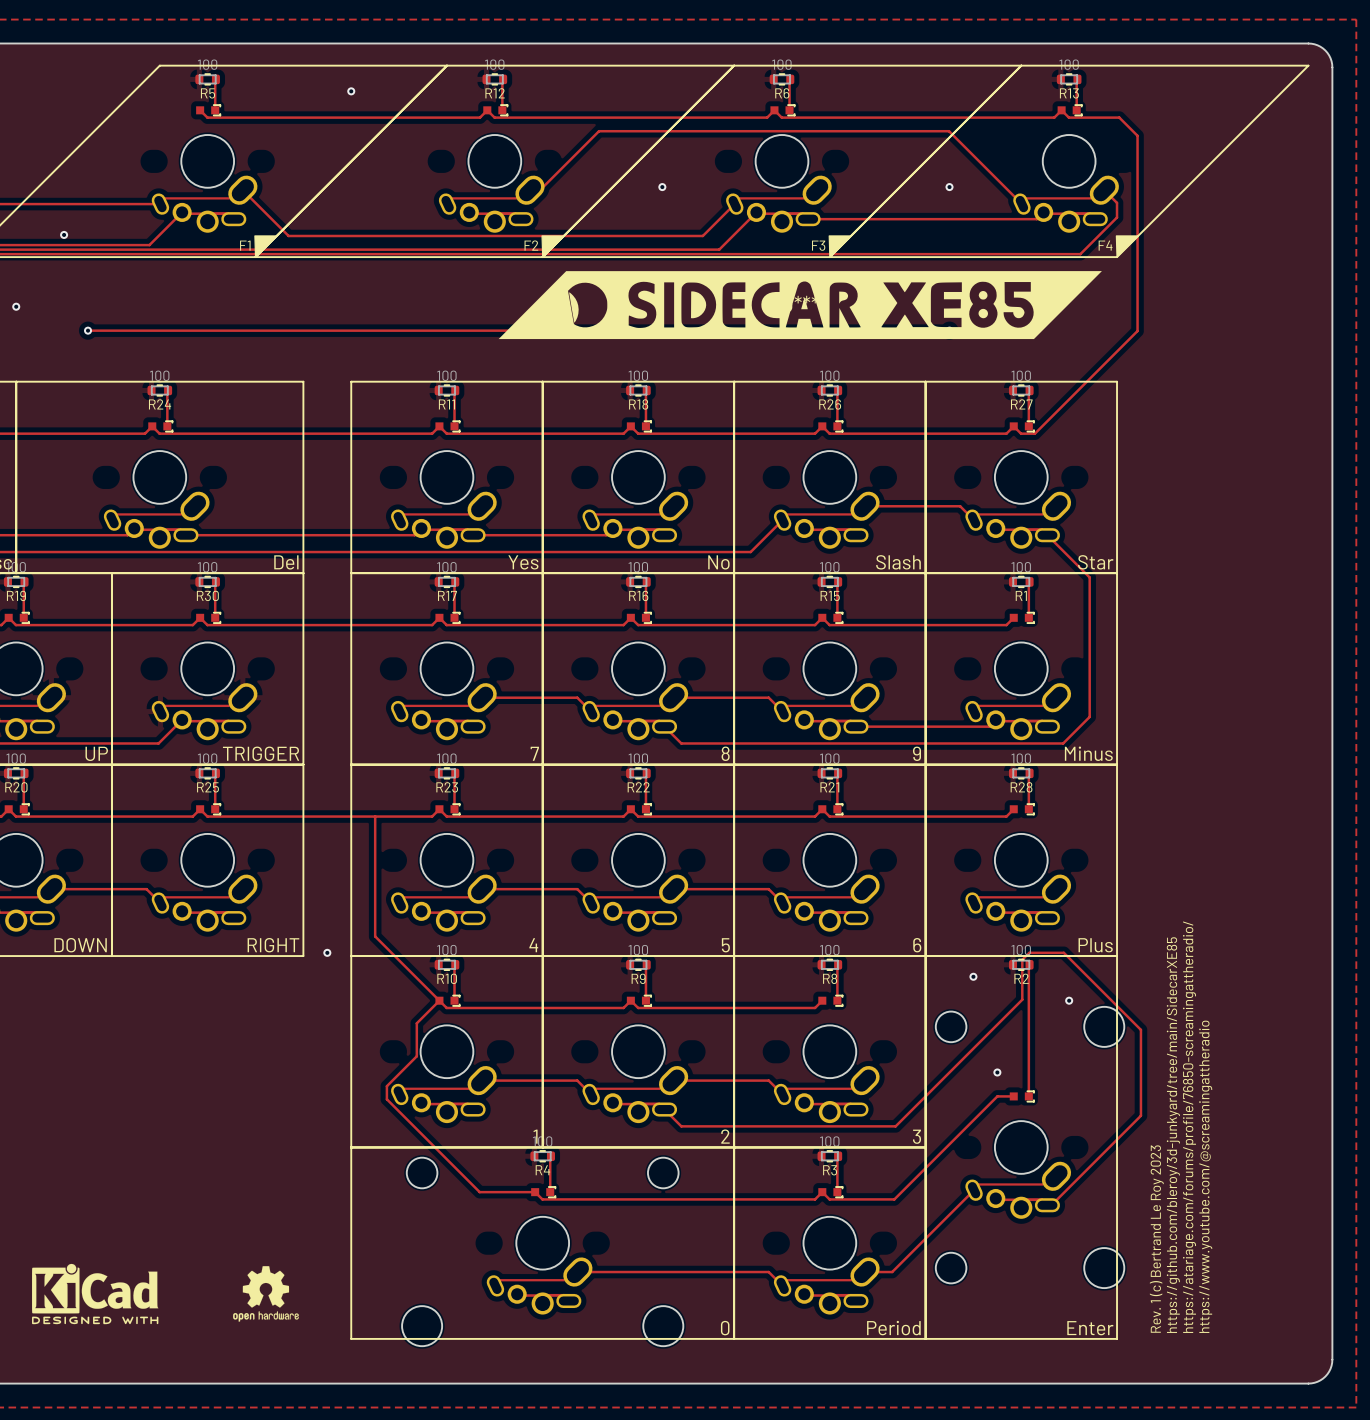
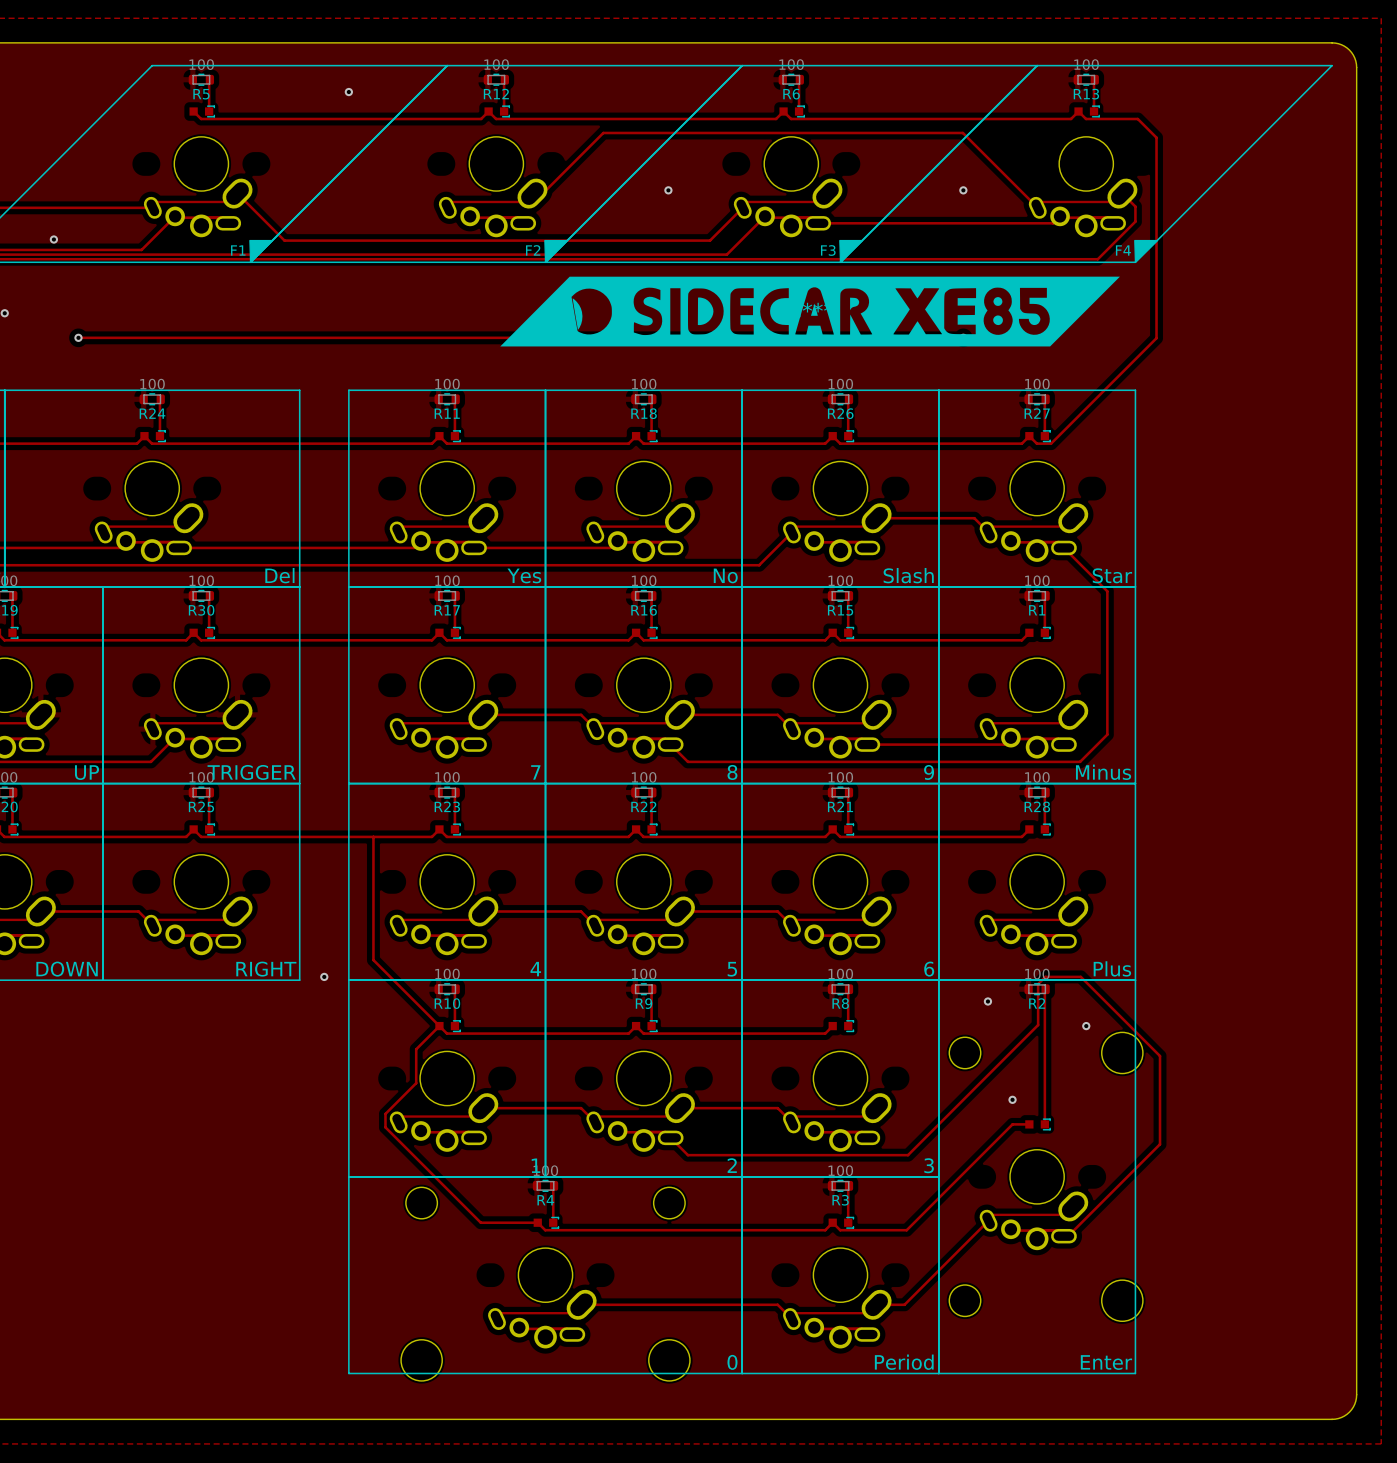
text: https://atariage.com/forums/profile/76850-screamingattheradio/ (1189, 1127) -> none
text: https://github.com/bleroy/3d-junkyard/tree/main/SidecarXE85 (1173, 1135) -> none
text: https://www.youtube.com/@screamingattheradio (1205, 1176) -> none
text: Rev. 1 (c) Bertrand Le Roy 2023 (1156, 1239) -> none
drawing: [31, 1263, 159, 1325] -> none
drawing: [233, 1266, 299, 1322] -> none

